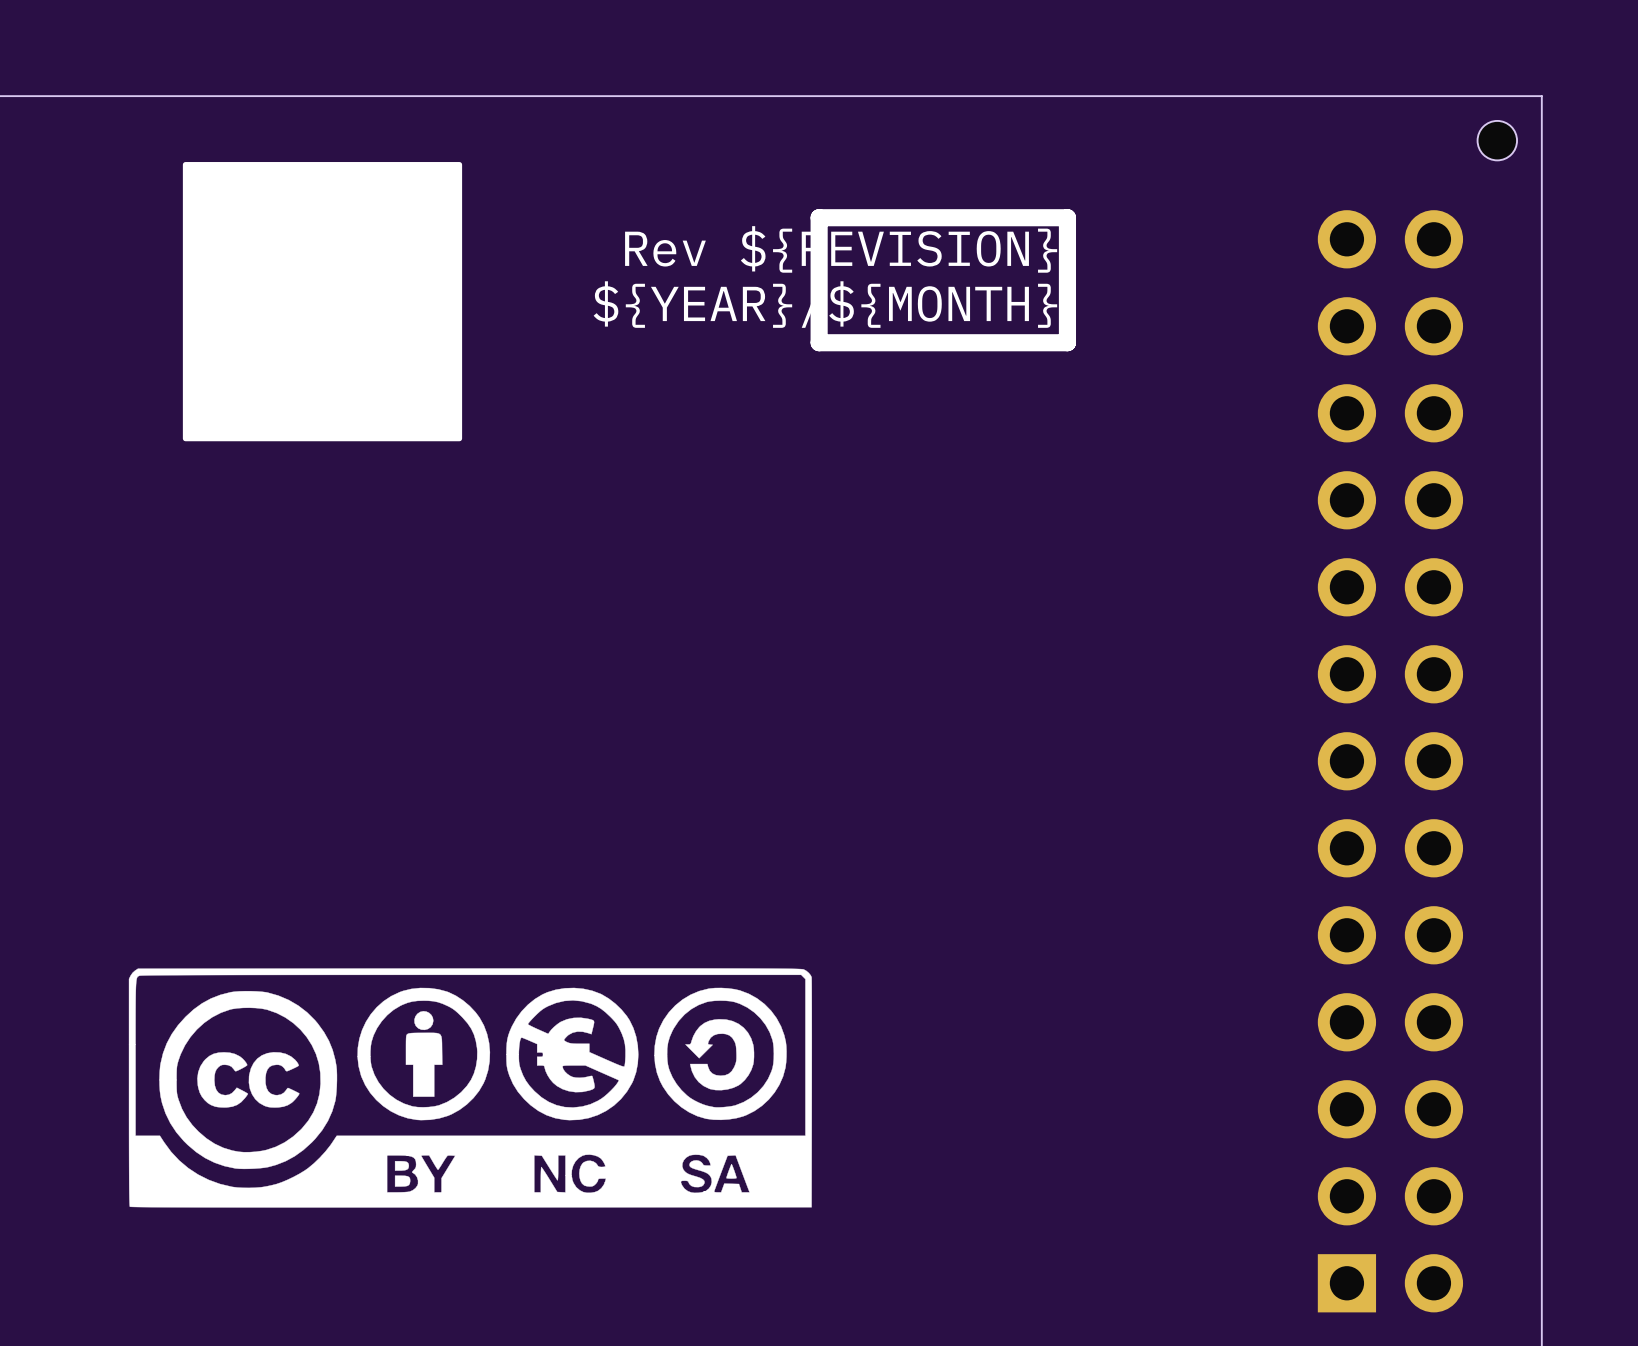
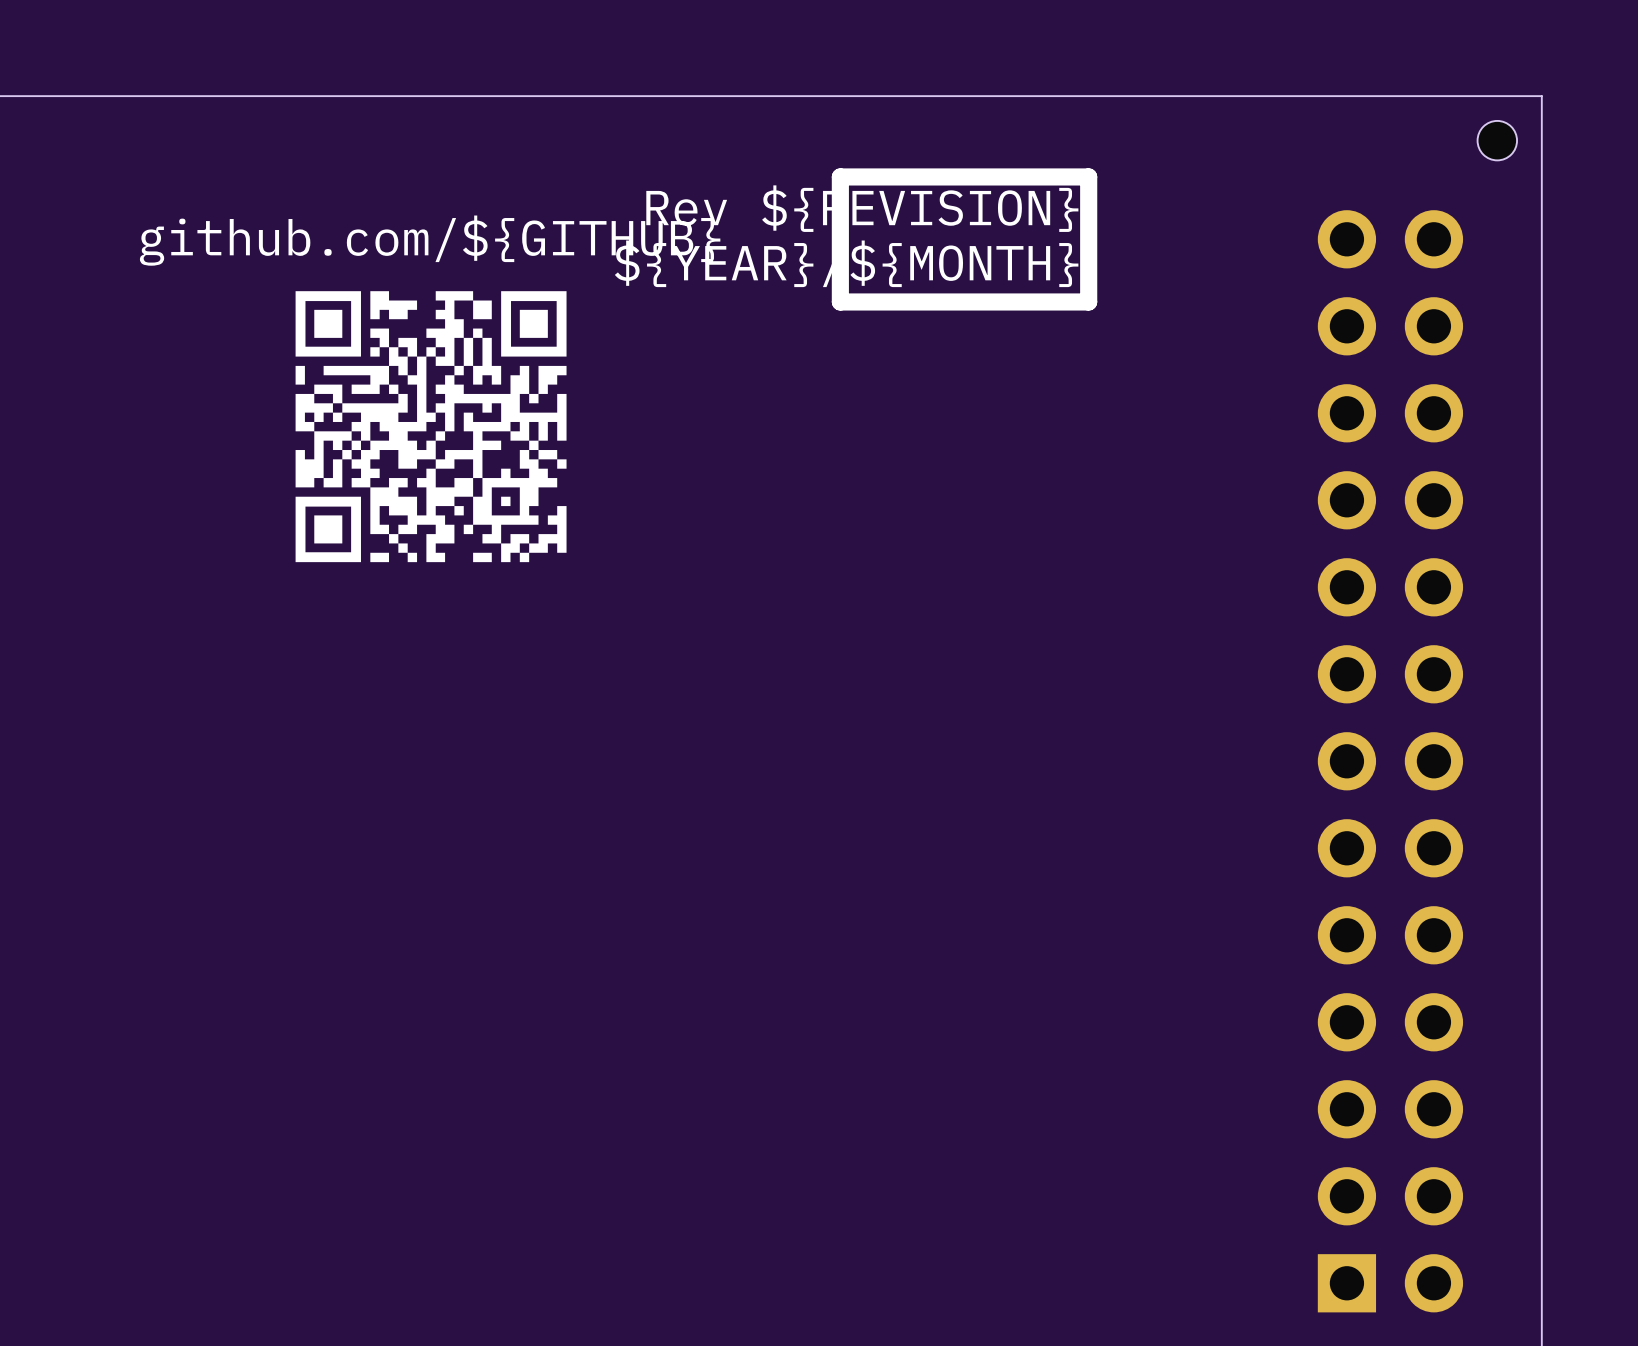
drawing: [182, 162, 463, 442] -> none
line: (1067, 217) (819, 217) (819, 342) (1067, 342) (1067, 217) -> (1088, 176) (840, 176) (840, 301) (1088, 301) (1088, 176)
text: none -> github.com/${GITHUB} (430, 240)
text position: Rev ${REVISION} (841, 249) -> Rev ${REVISION} (862, 208)
drawing: none -> [295, 291, 567, 563]
text position: ${YEAR}/${MONTH} (825, 304) -> ${YEAR}/${MONTH} (846, 263)
drawing: [128, 968, 813, 1208] -> none

